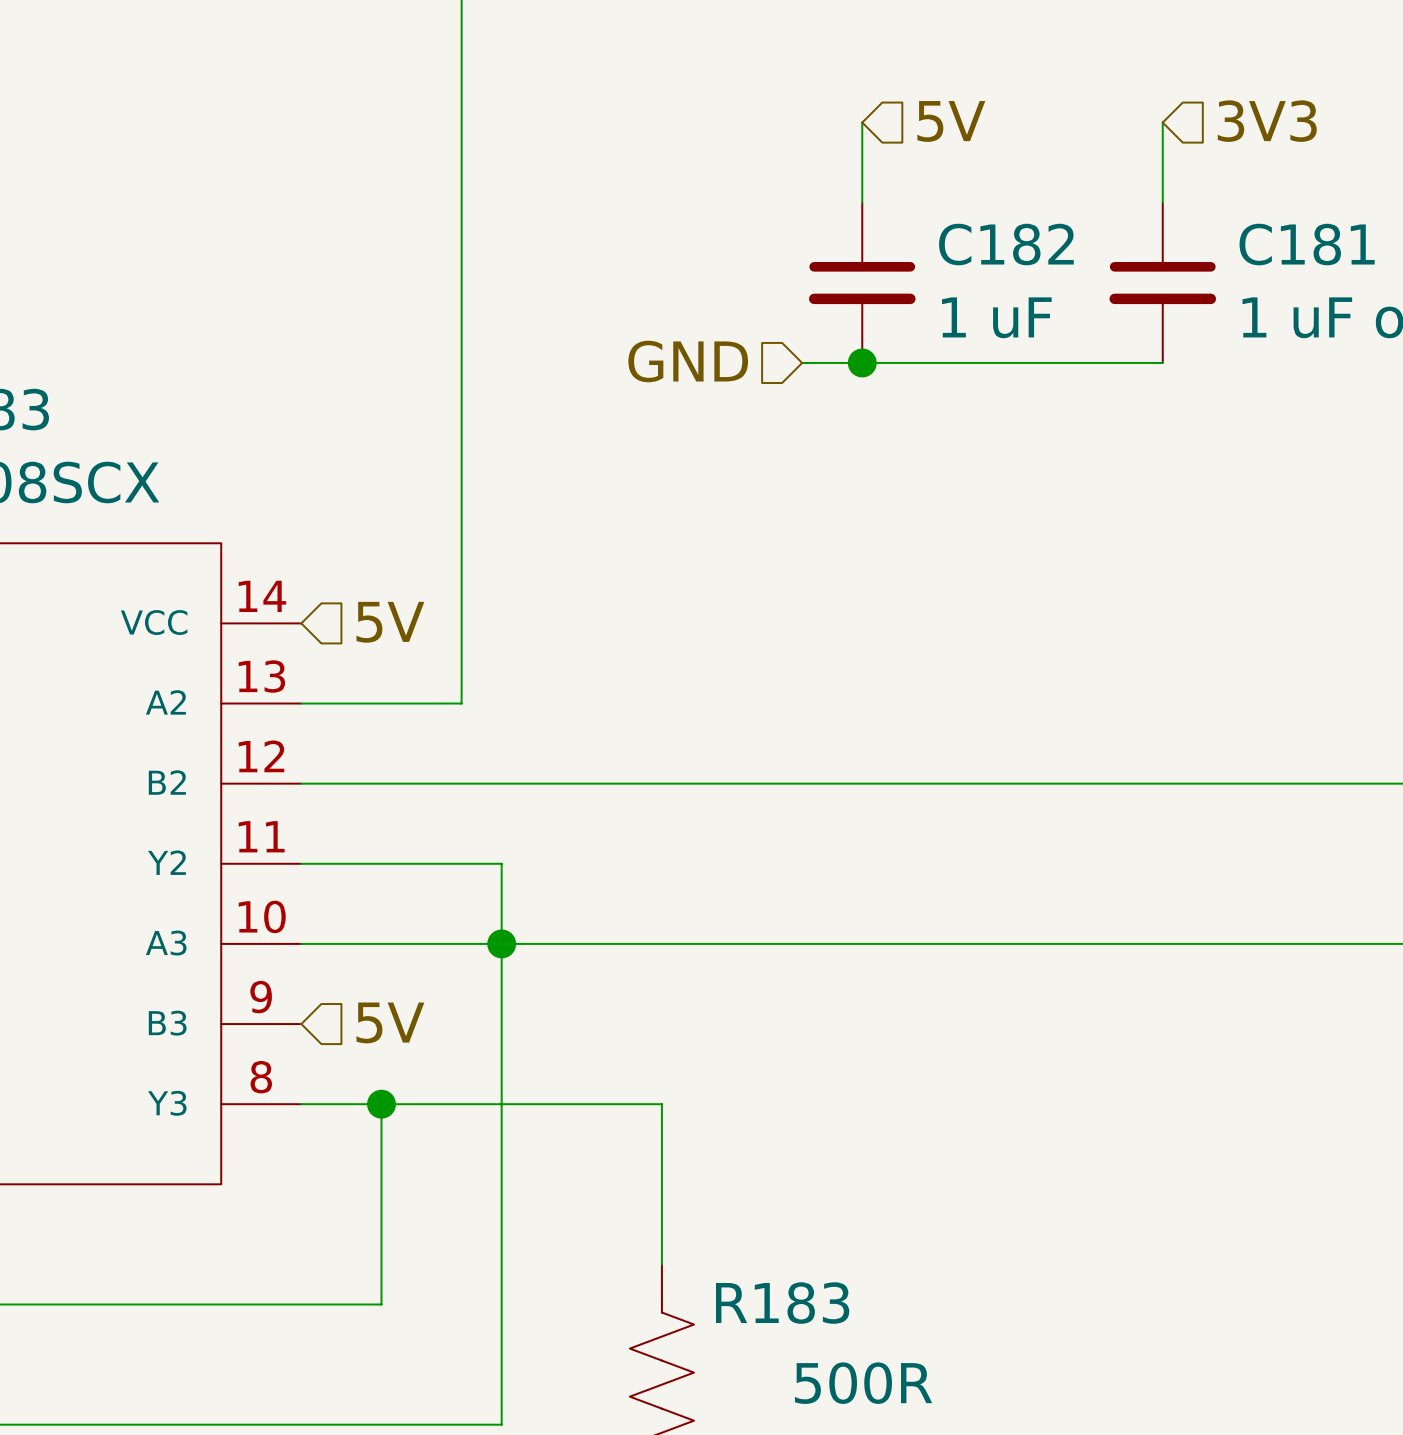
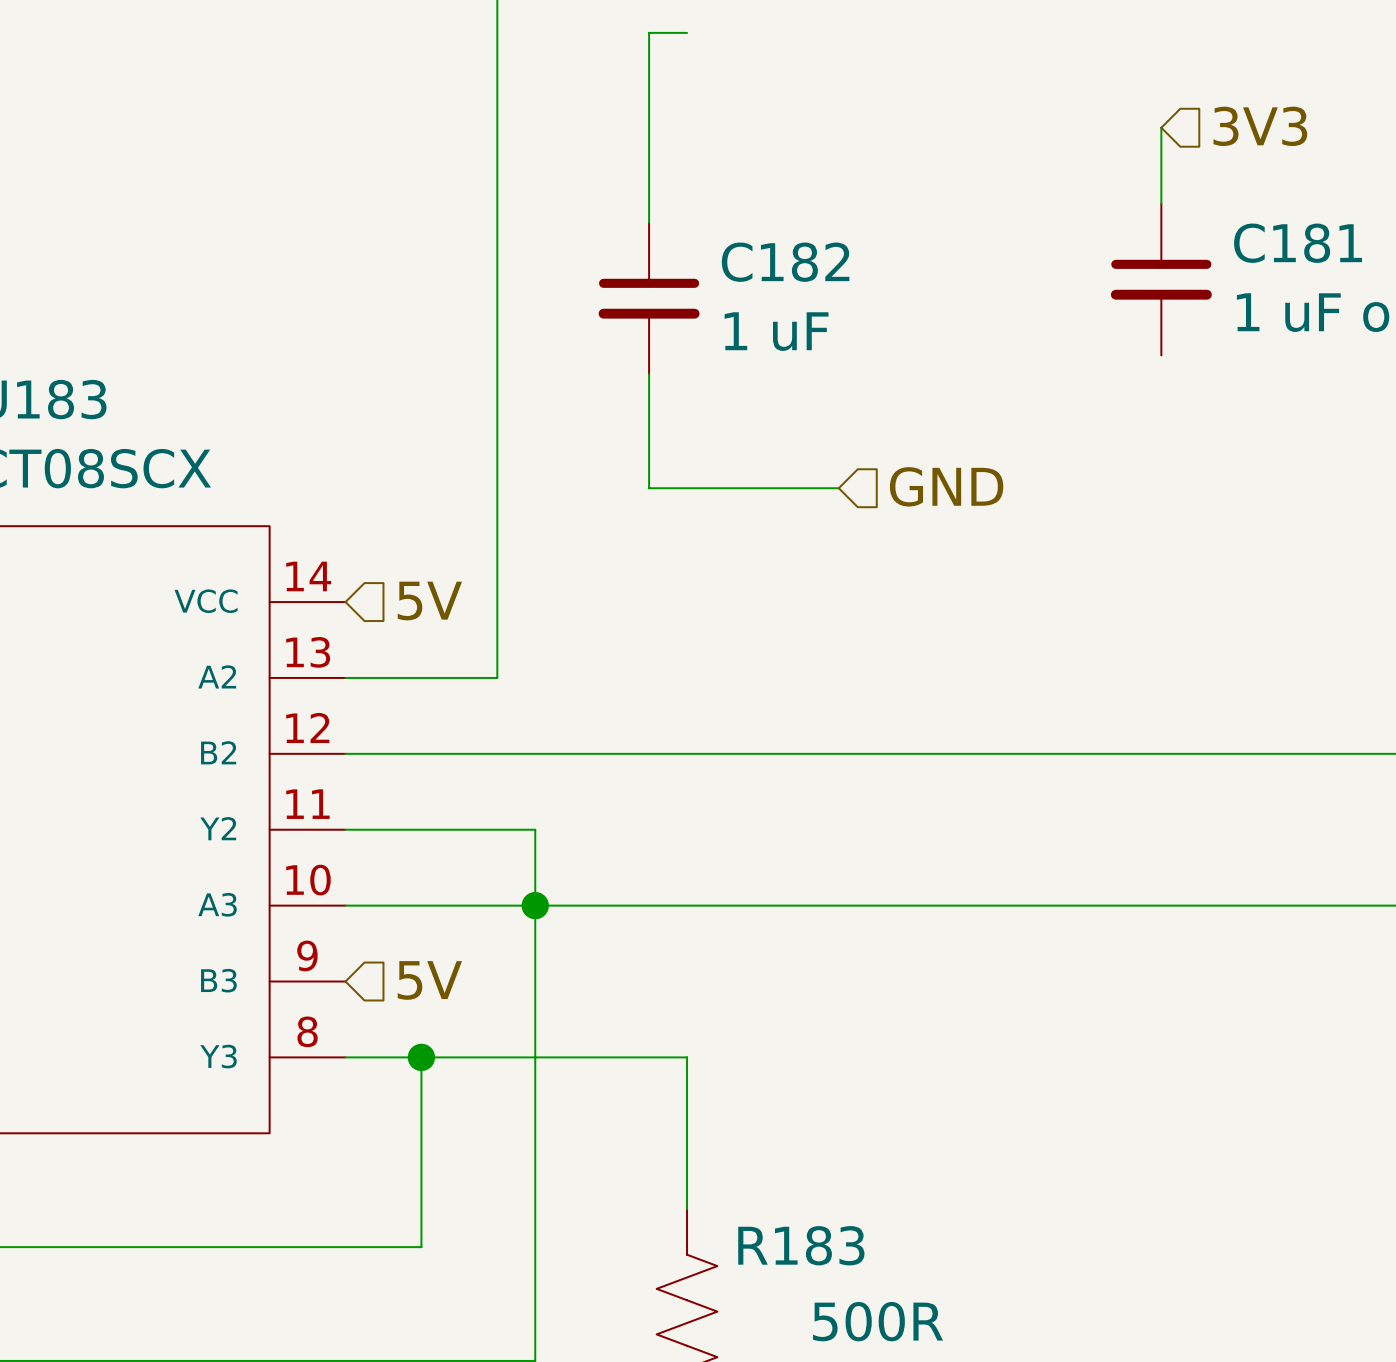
wire: none -> (687, 32) (649, 32) (649, 222)
hierarchical label: 5V (951, 121) -> none
wire: (862, 122) (862, 202) -> none
C182 position: (862, 282) -> (649, 298)
hierarchical label rotation: 0° (688, 361) -> 180° (946, 486)
hierarchical label position: GND (688, 361) -> GND (946, 486)
wire: (802, 362) (1162, 362) -> none
junction: (862, 362) -> none
wire: none -> (649, 374) (649, 488) (838, 488)

